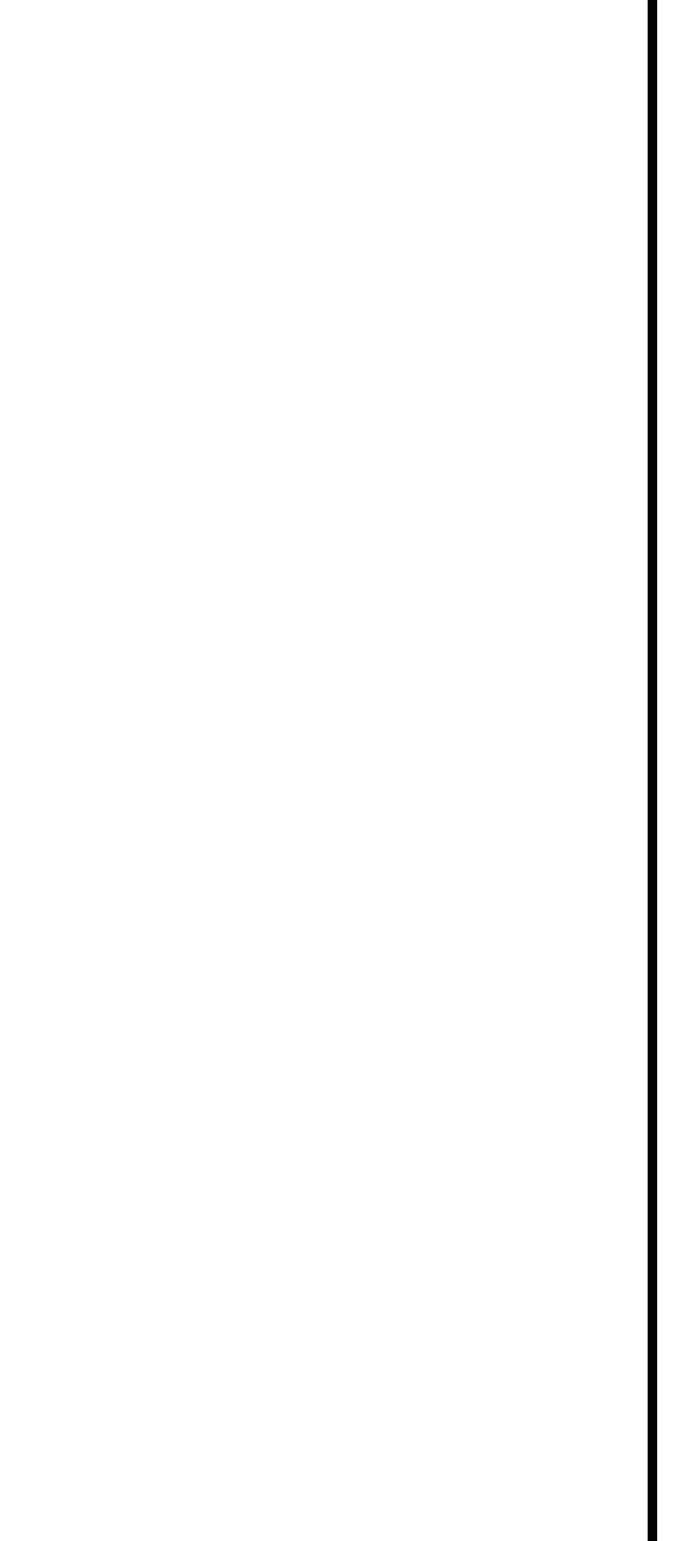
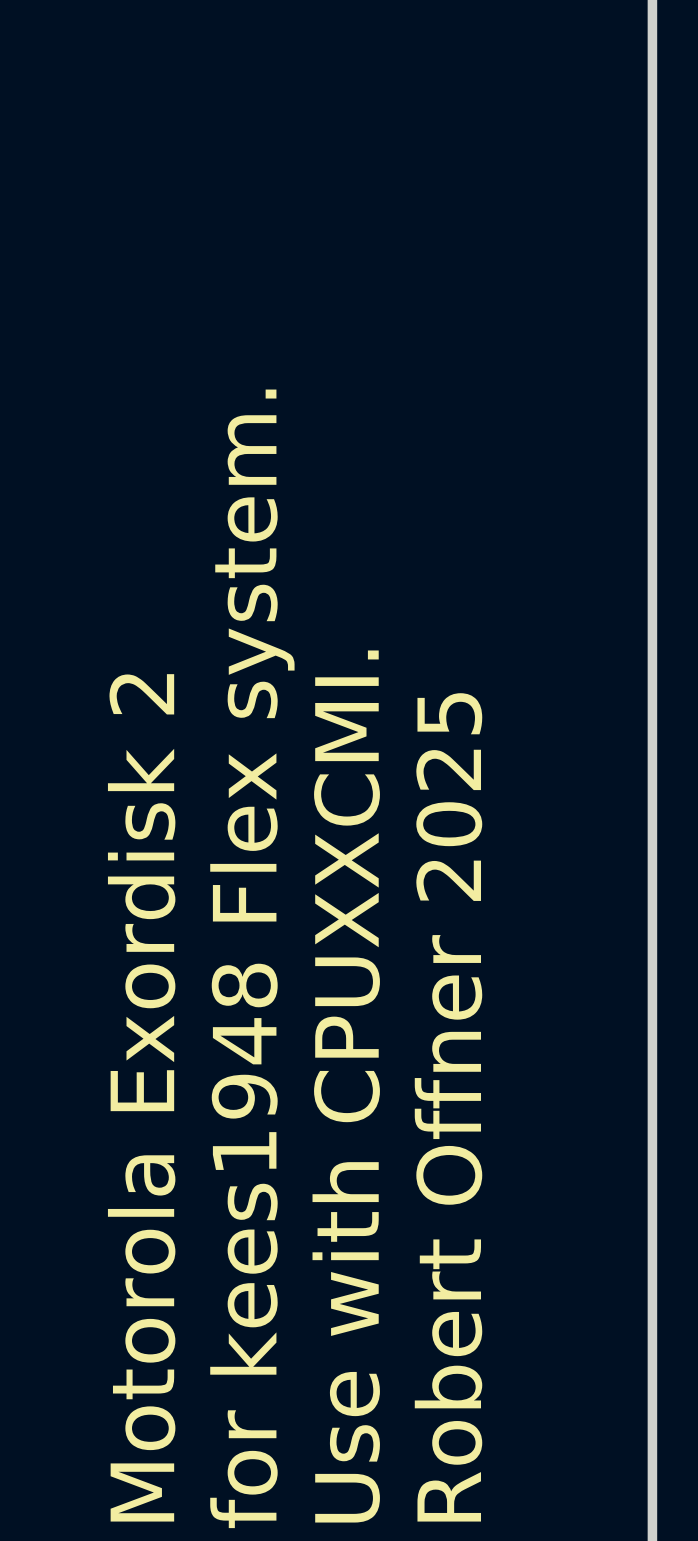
text: none -> for kees1948 Flex system. (252, 958)
text: none -> Use with CPUXXCMI. (346, 1086)
text: none -> Motorola Exordisk 2 (141, 1097)
text: none -> Robert Offner 2025 (448, 1107)

